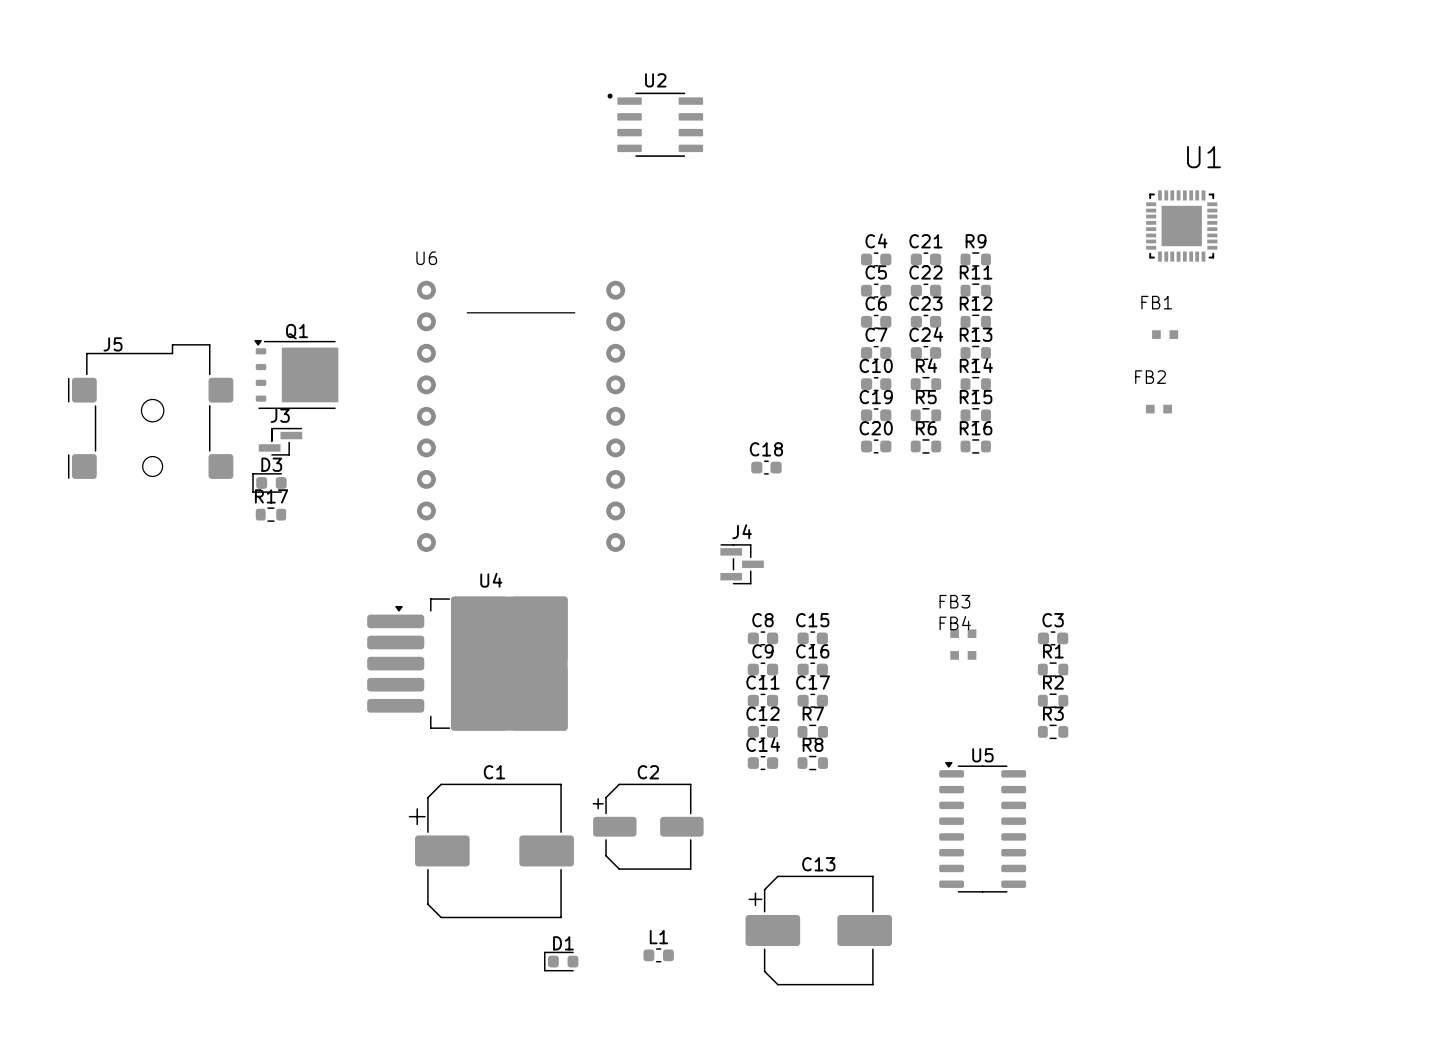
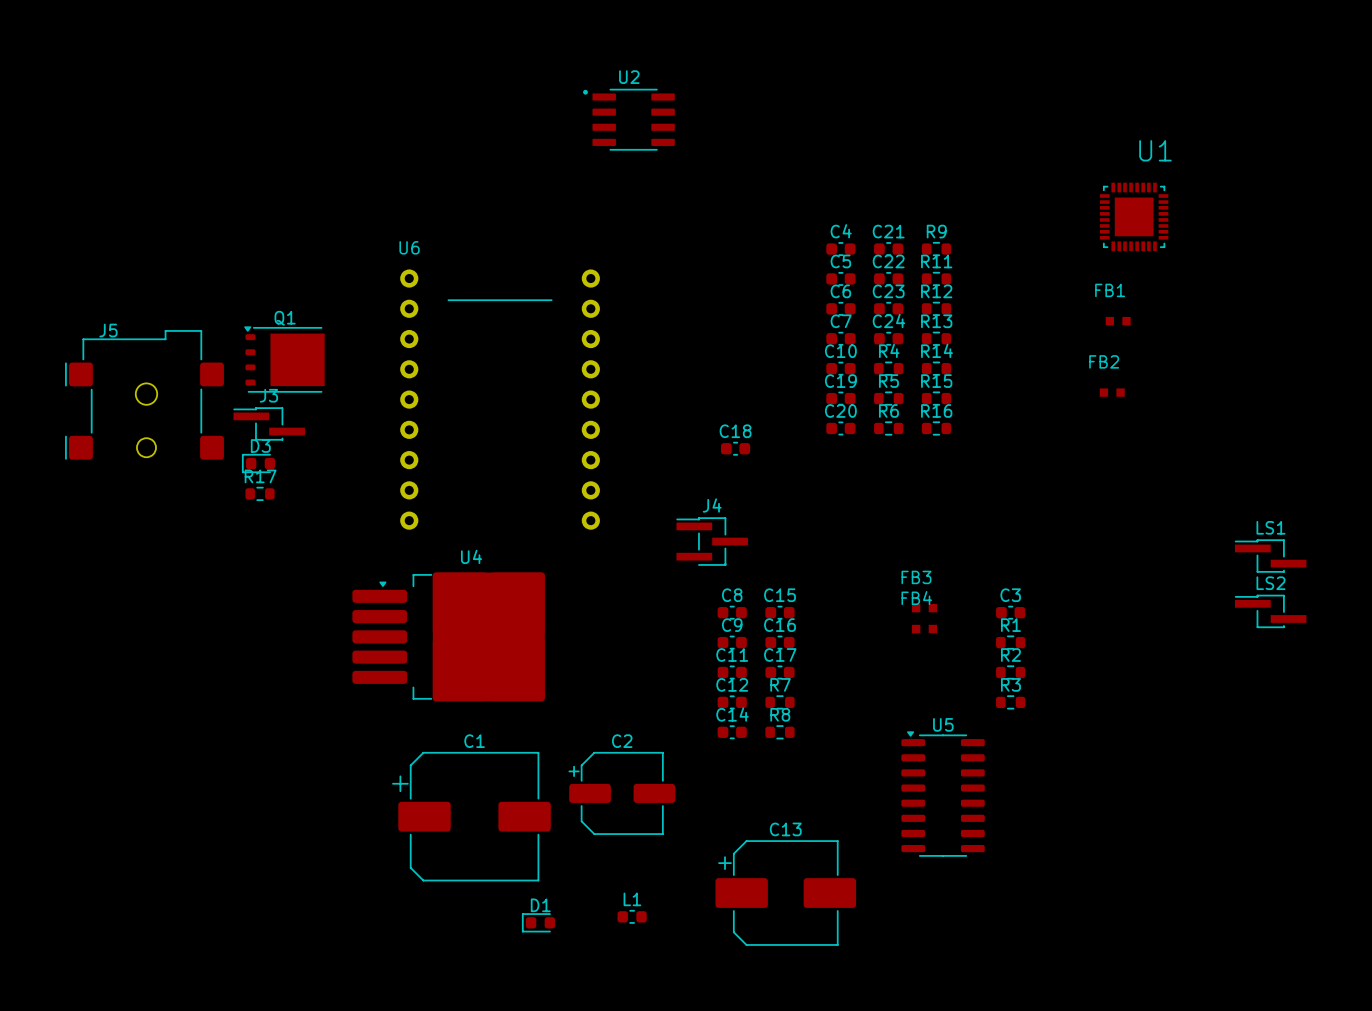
J3 footprint: [258, 427, 303, 456] -> [233, 407, 305, 441]
J4 footprint: [720, 544, 764, 585] -> [676, 517, 748, 566]
LS1: none -> (1270, 556)
LS2: none -> (1270, 611)

